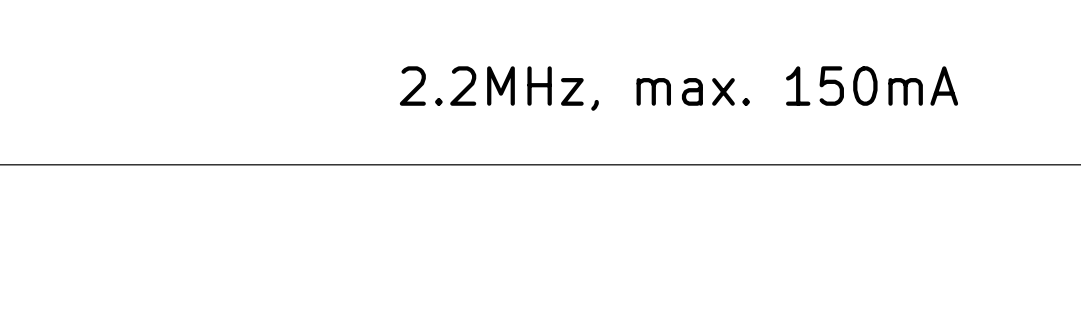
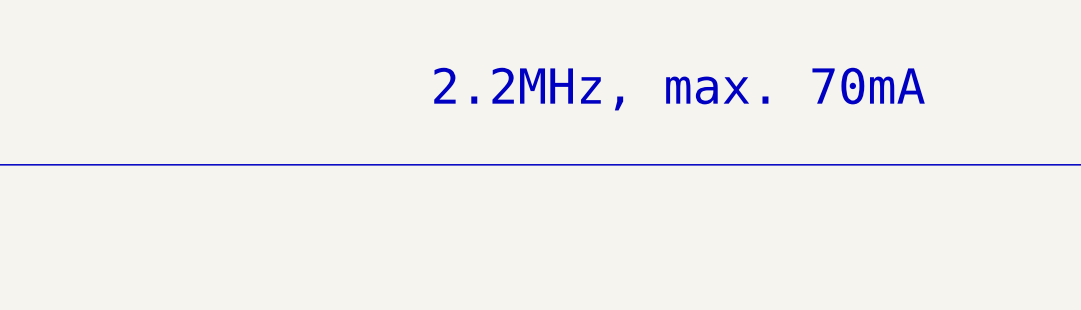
text: 2.2MHz, max. 150mA (678, 88) -> 2.2MHz, max. 70mA (679, 89)

